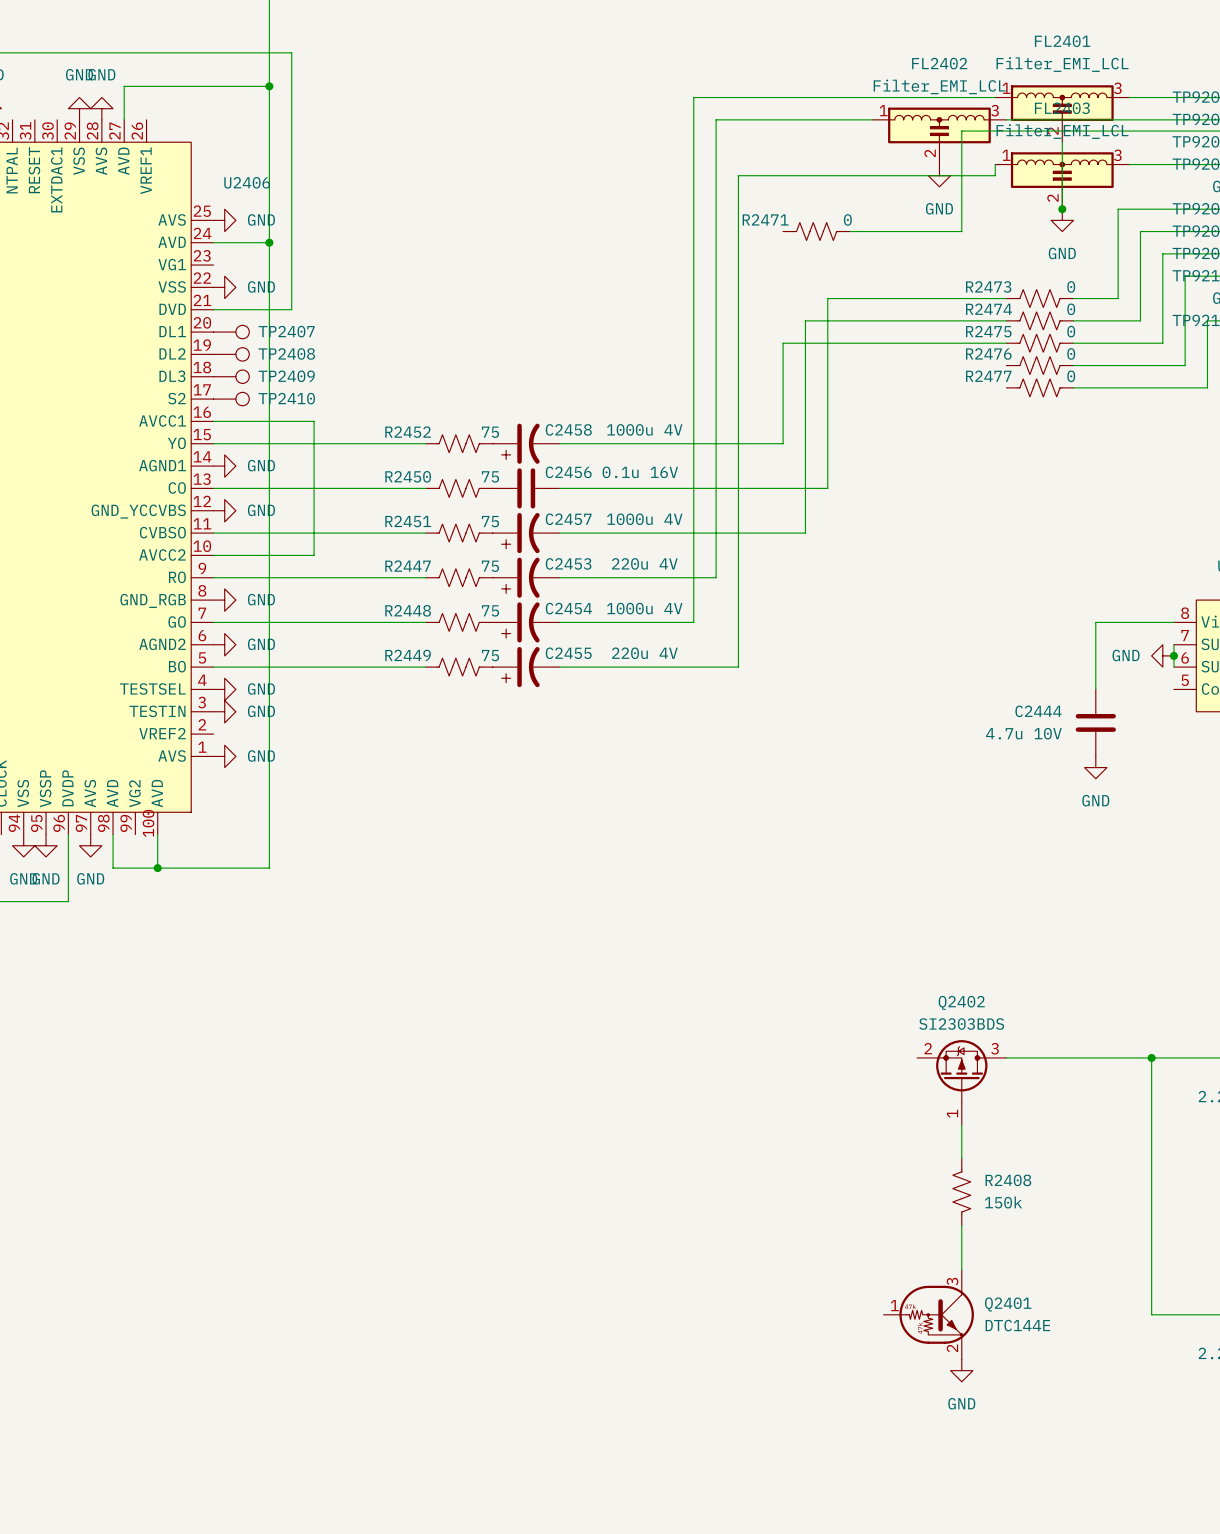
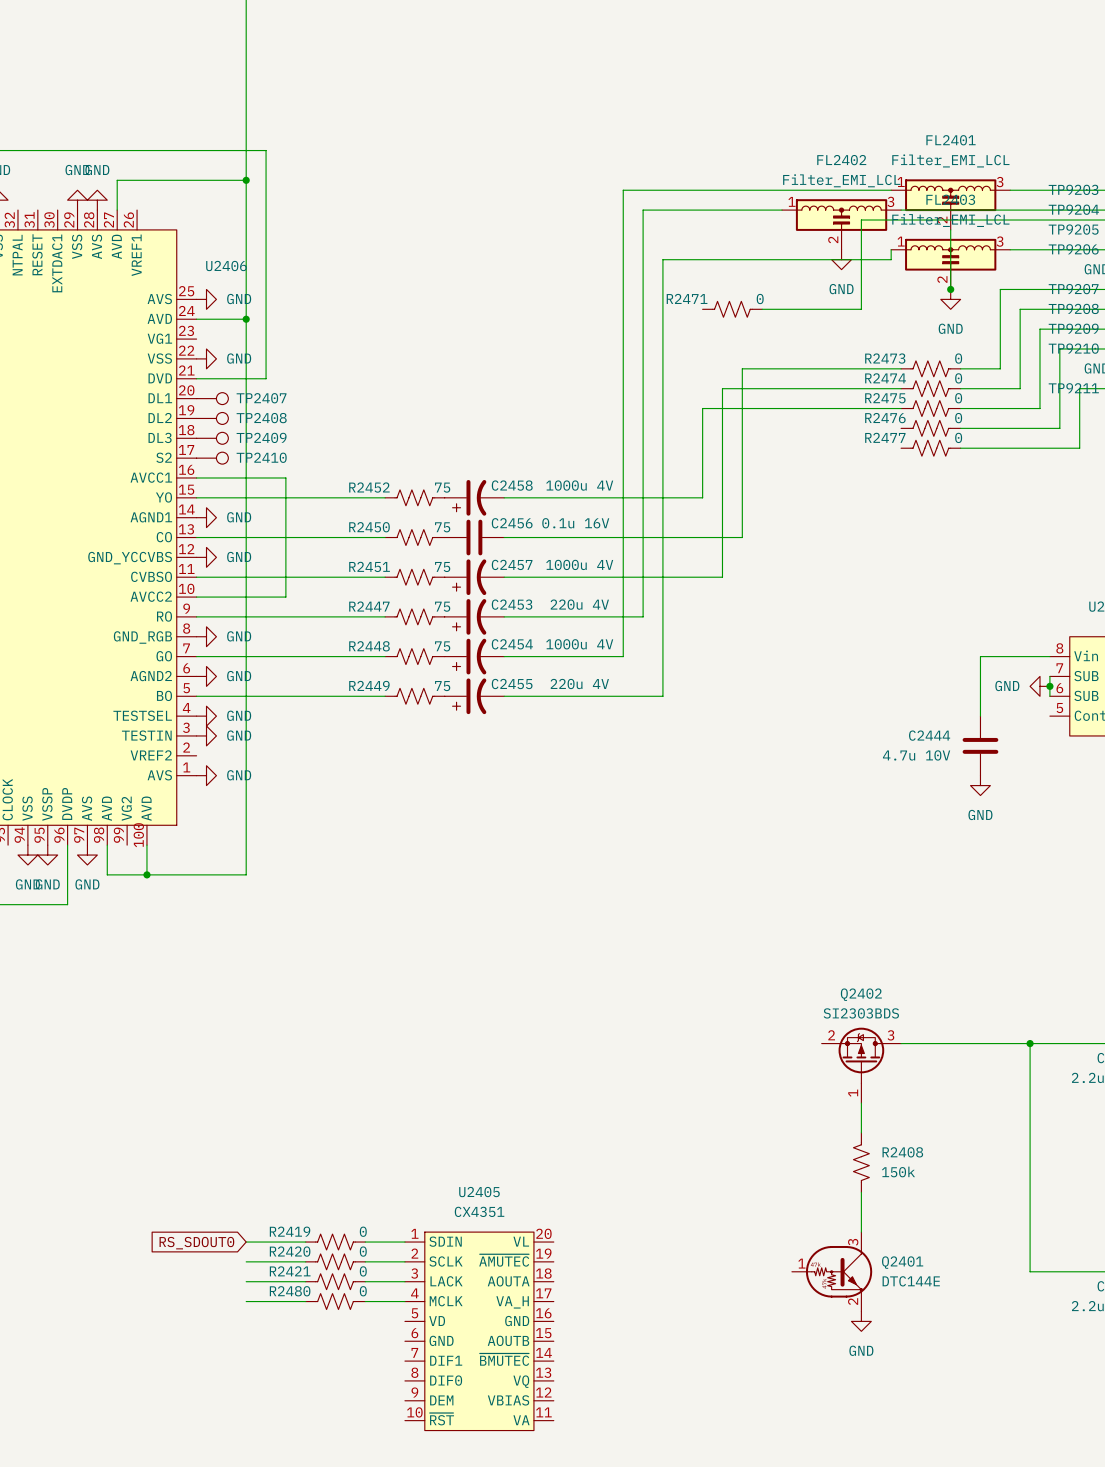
wire: none -> (246, 1242) (305, 1242)
R2419: none -> 0 (335, 1242)
wire: none -> (365, 1242) (404, 1242)
global label: none -> RS_SDOUT0 (196, 1243)
wire: none -> (246, 1261) (305, 1261)
R2420: none -> 0 (335, 1261)
wire: none -> (365, 1261) (404, 1261)
wire: none -> (246, 1281) (305, 1281)
R2421: none -> 0 (335, 1281)
wire: none -> (365, 1281) (404, 1281)
wire: none -> (246, 1301) (305, 1301)
R2480: none -> 0 (335, 1301)
wire: none -> (365, 1301) (404, 1301)
U2405: none -> CX4351 (479, 1331)

